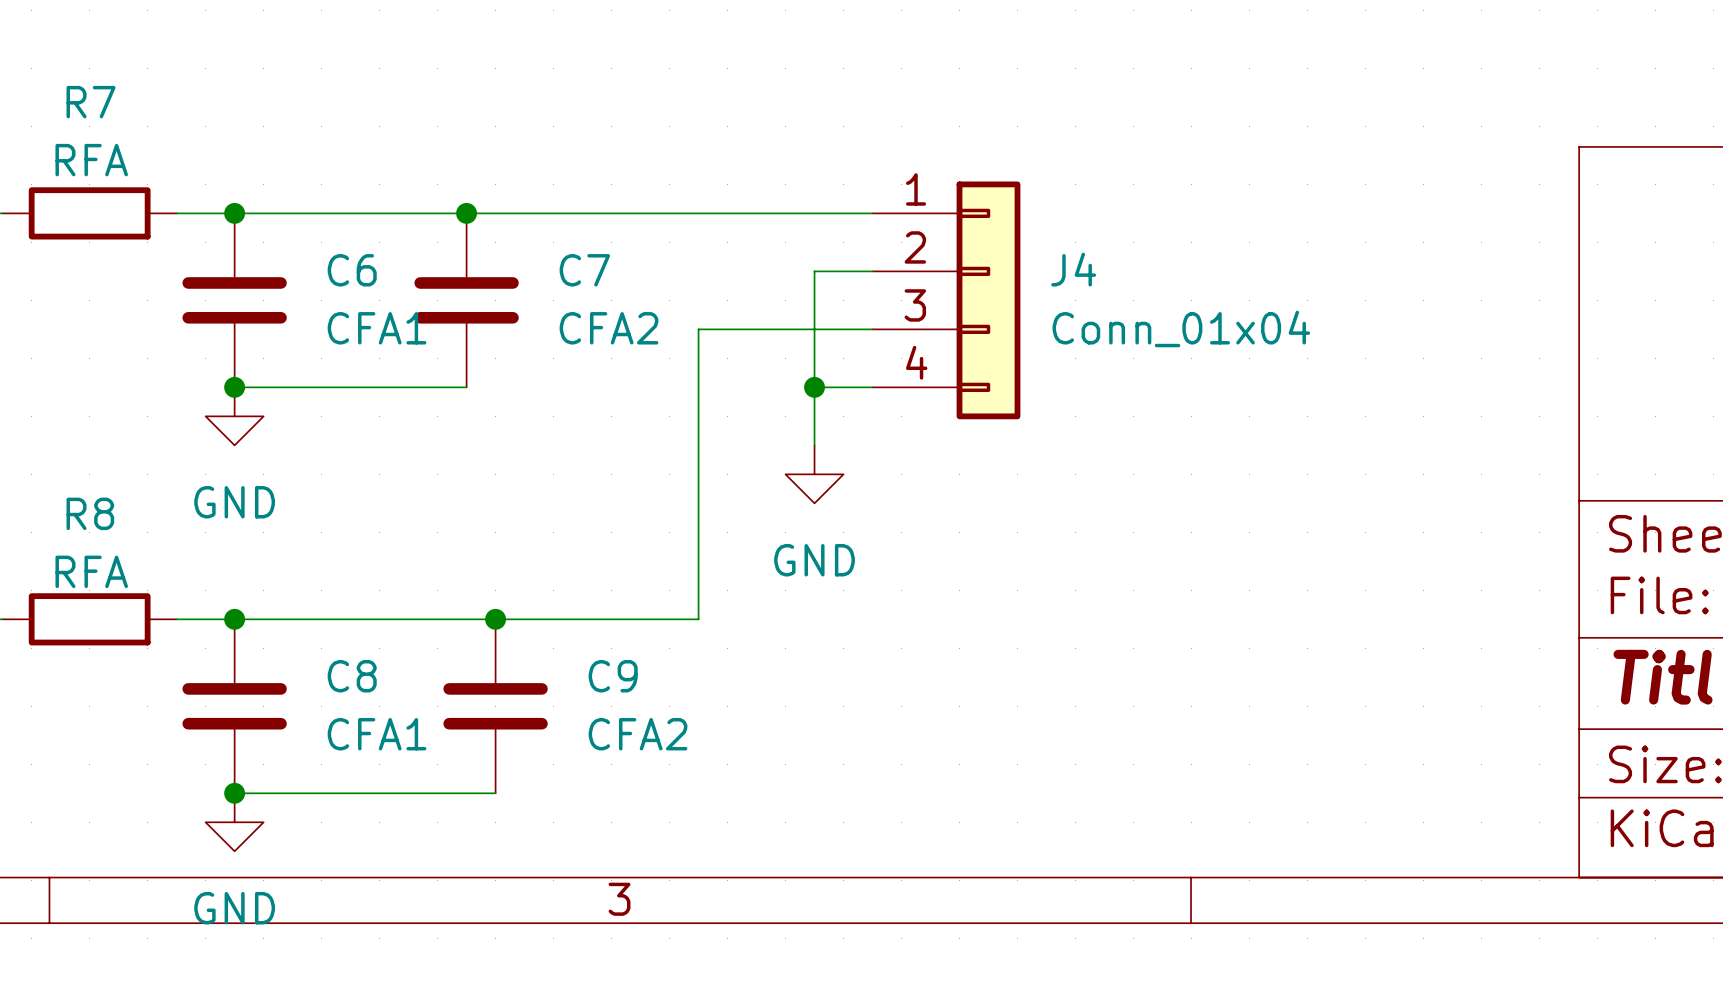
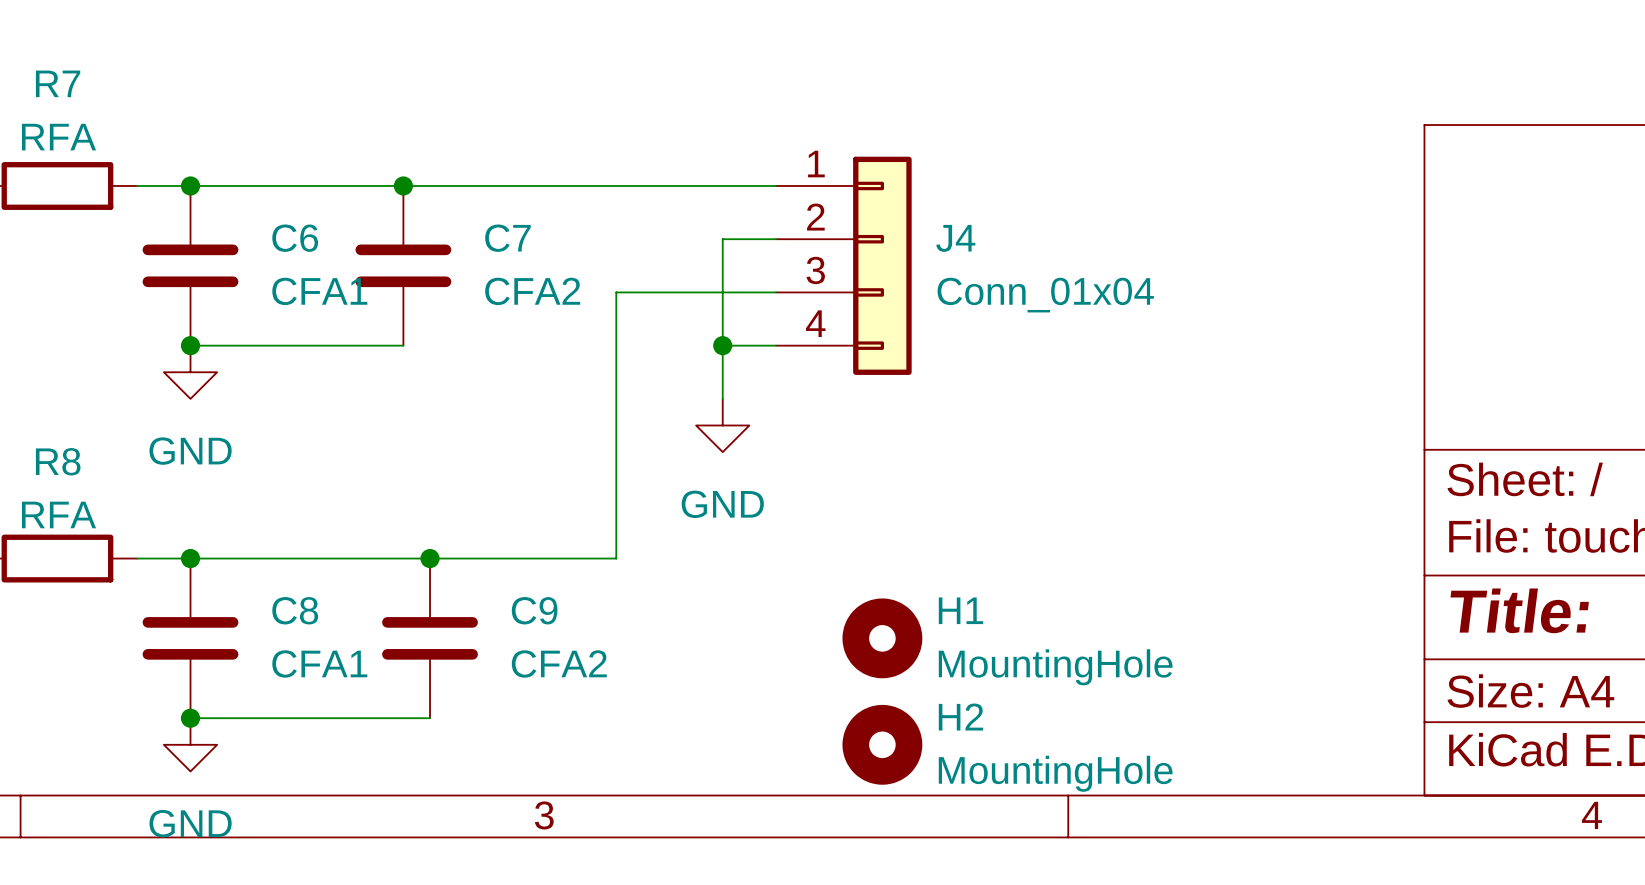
H1: none -> MountingHole (882, 638)
H2: none -> MountingHole (882, 744)

